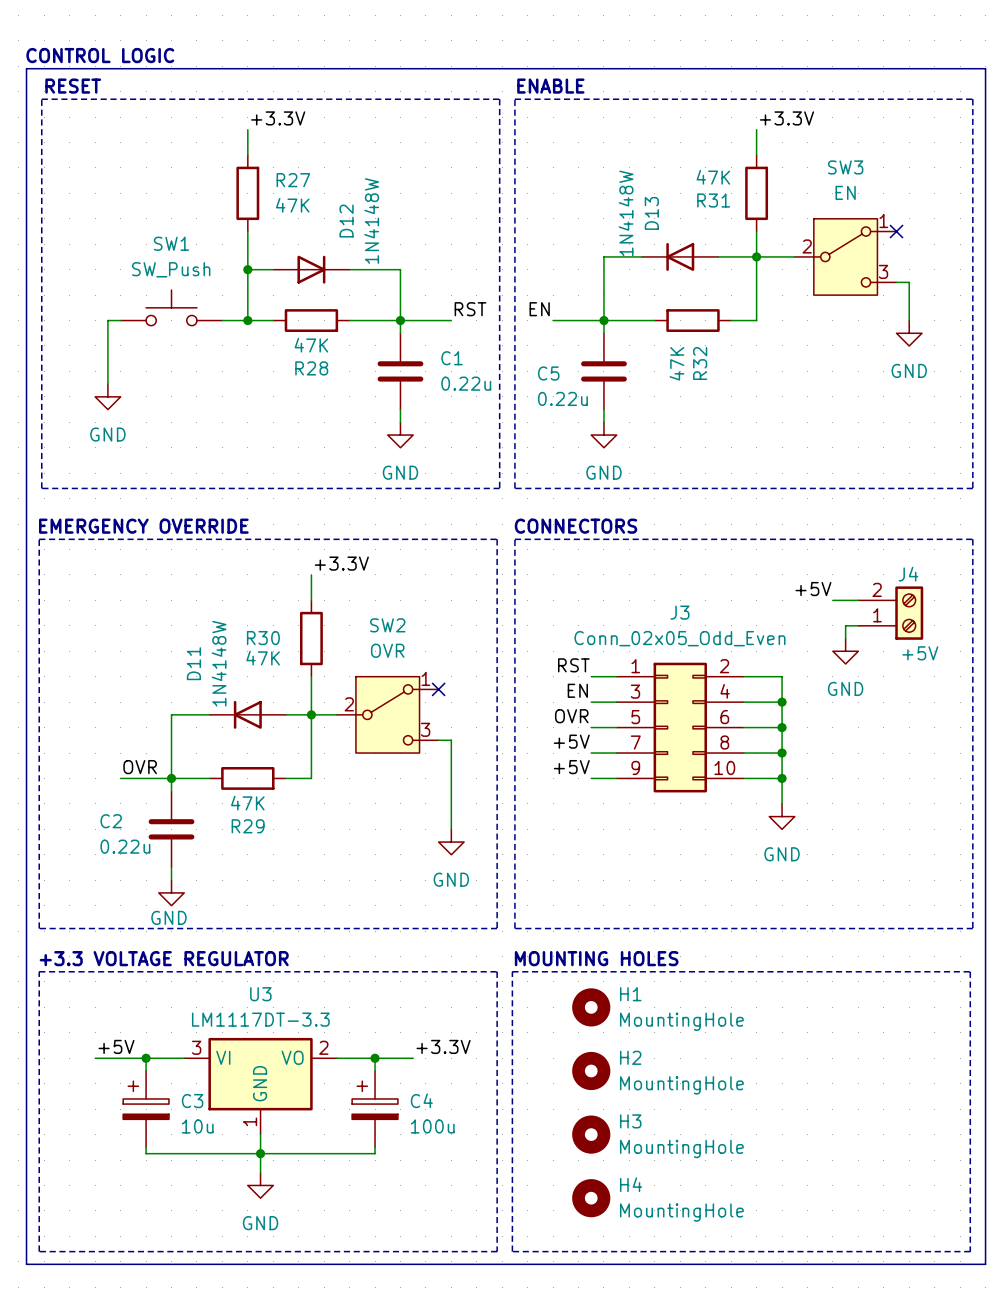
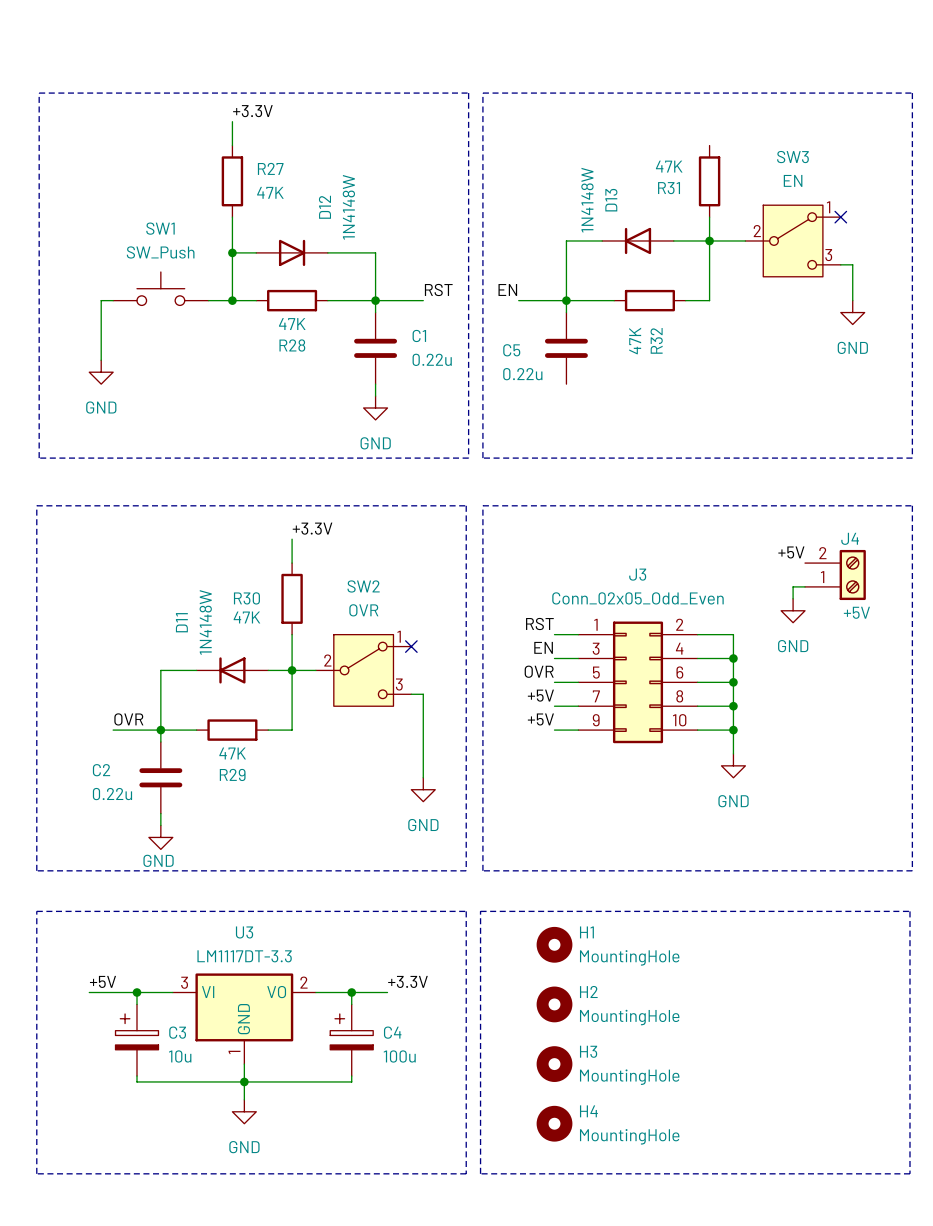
text: CONTROL LOGIC (100, 55) -> none
line: (26, 68) (985, 68) (985, 1264) (26, 1264) (26, 68) -> none
text: RESET (73, 86) -> none
text: ENABLE (550, 86) -> none
label: +3.3V (786, 118) -> none
wire: (756, 129) (756, 155) -> none
wire: (603, 409) (603, 422) -> none
power symbol: GND (603, 435) -> none
text: EMERGENCY OVERRIDE (143, 526) -> none
text: CONNECTORS (575, 526) -> none
label position: +5V (813, 589) -> +5V (791, 552)
wire: (832, 600) (858, 600) -> none
text: +3.3 VOLTAGE REGULATOR (164, 958) -> none
text: MOUNTING HOLES (596, 958) -> none

